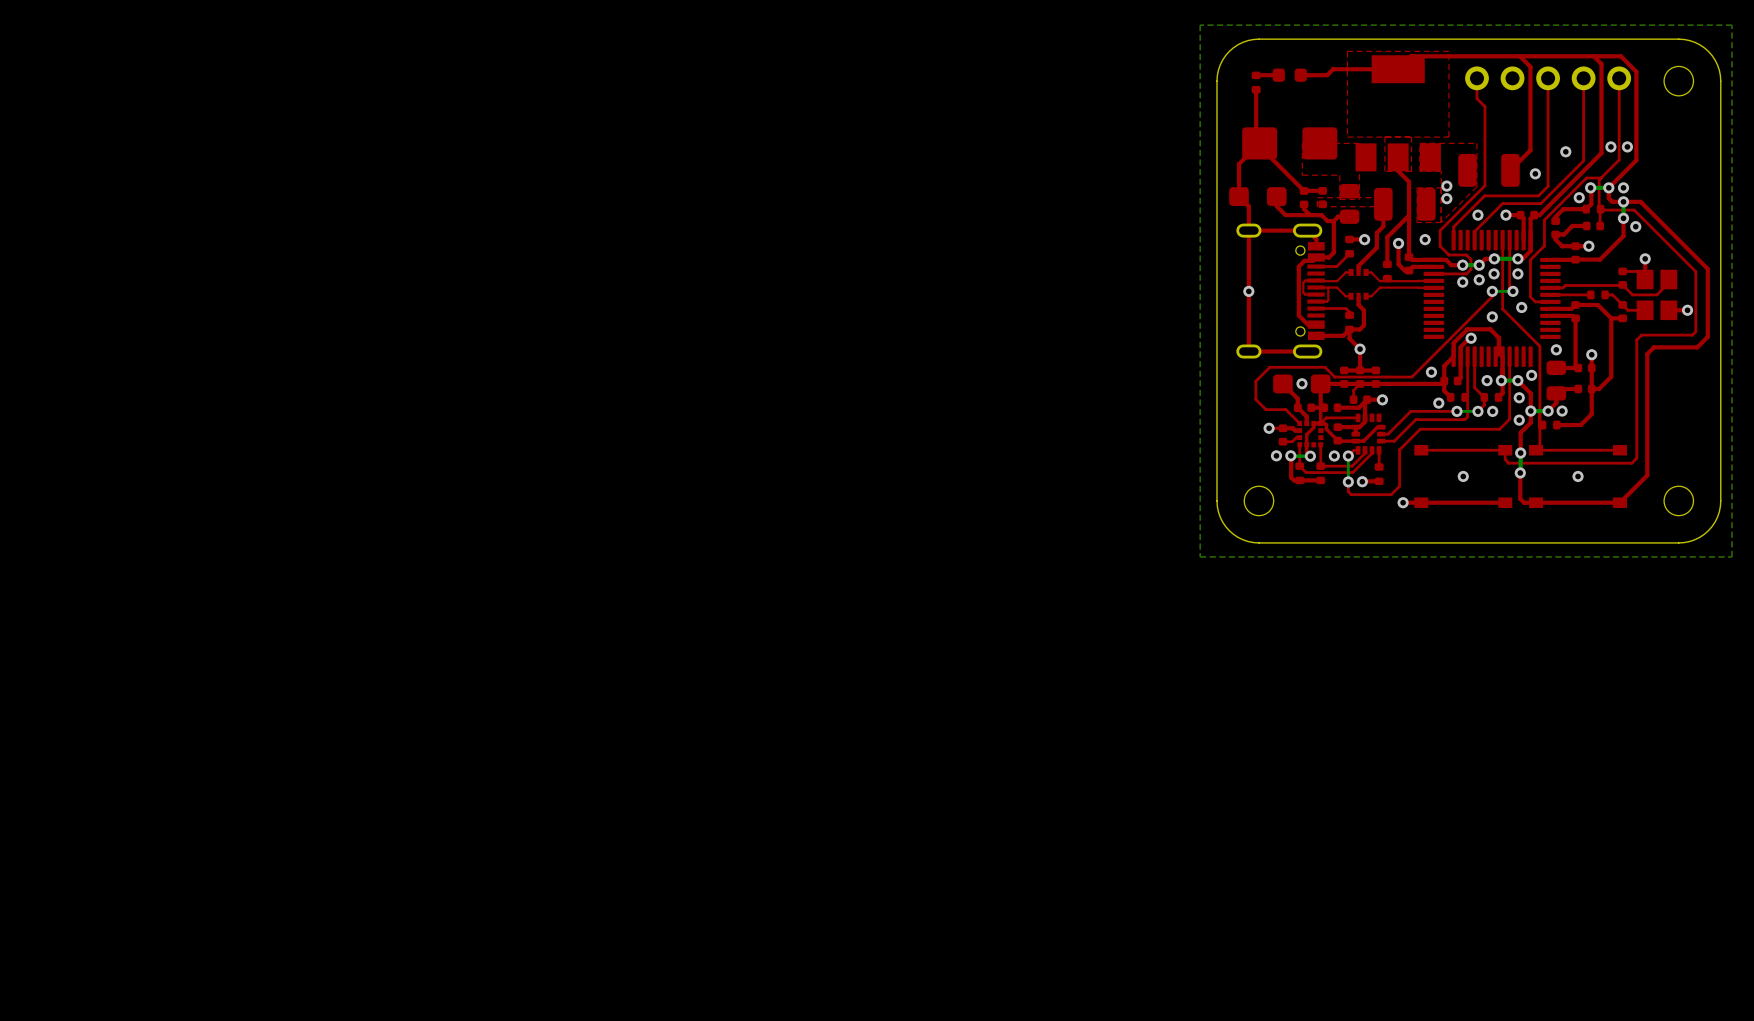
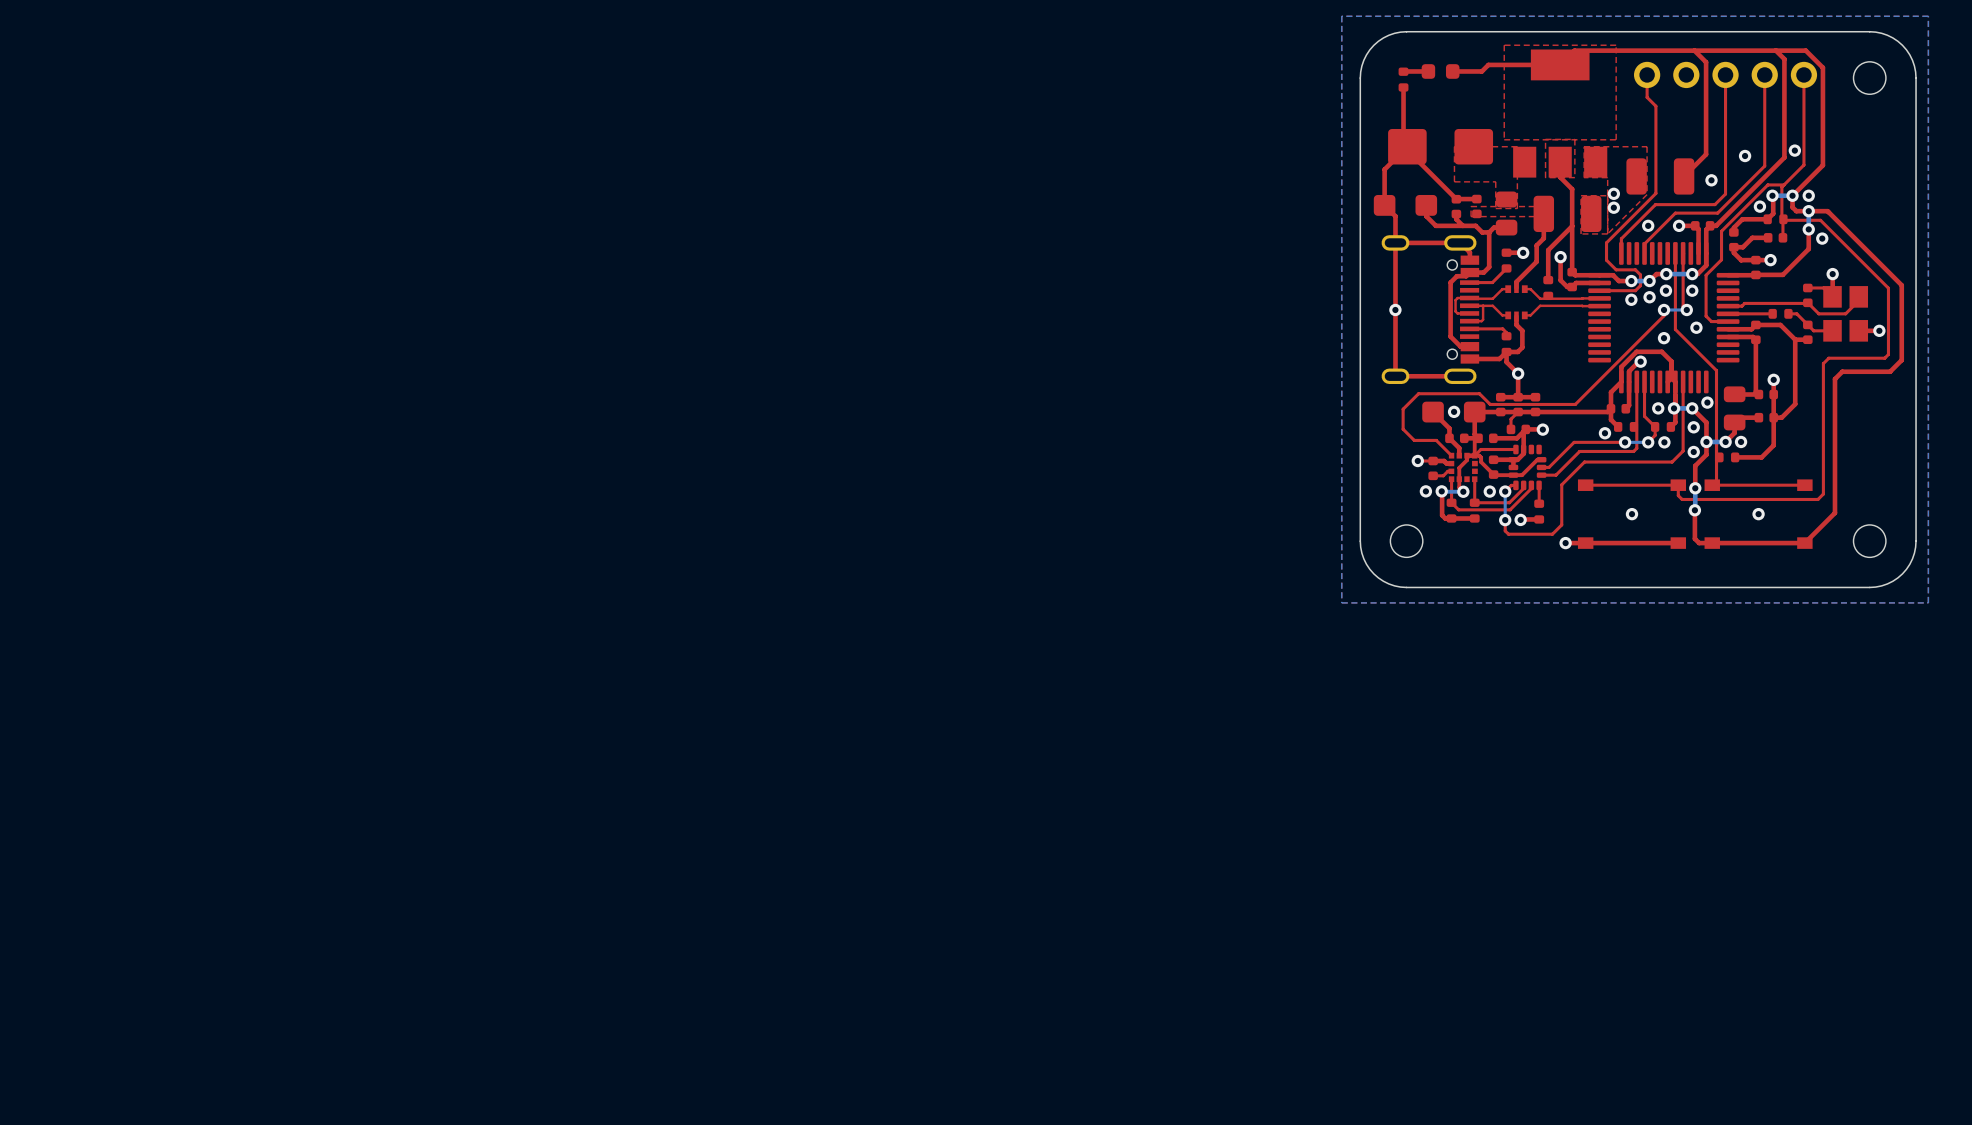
via: (1627, 146) -> none
via: (1425, 239) -> none
via: (1556, 349) -> none
via: (1431, 372) -> none

